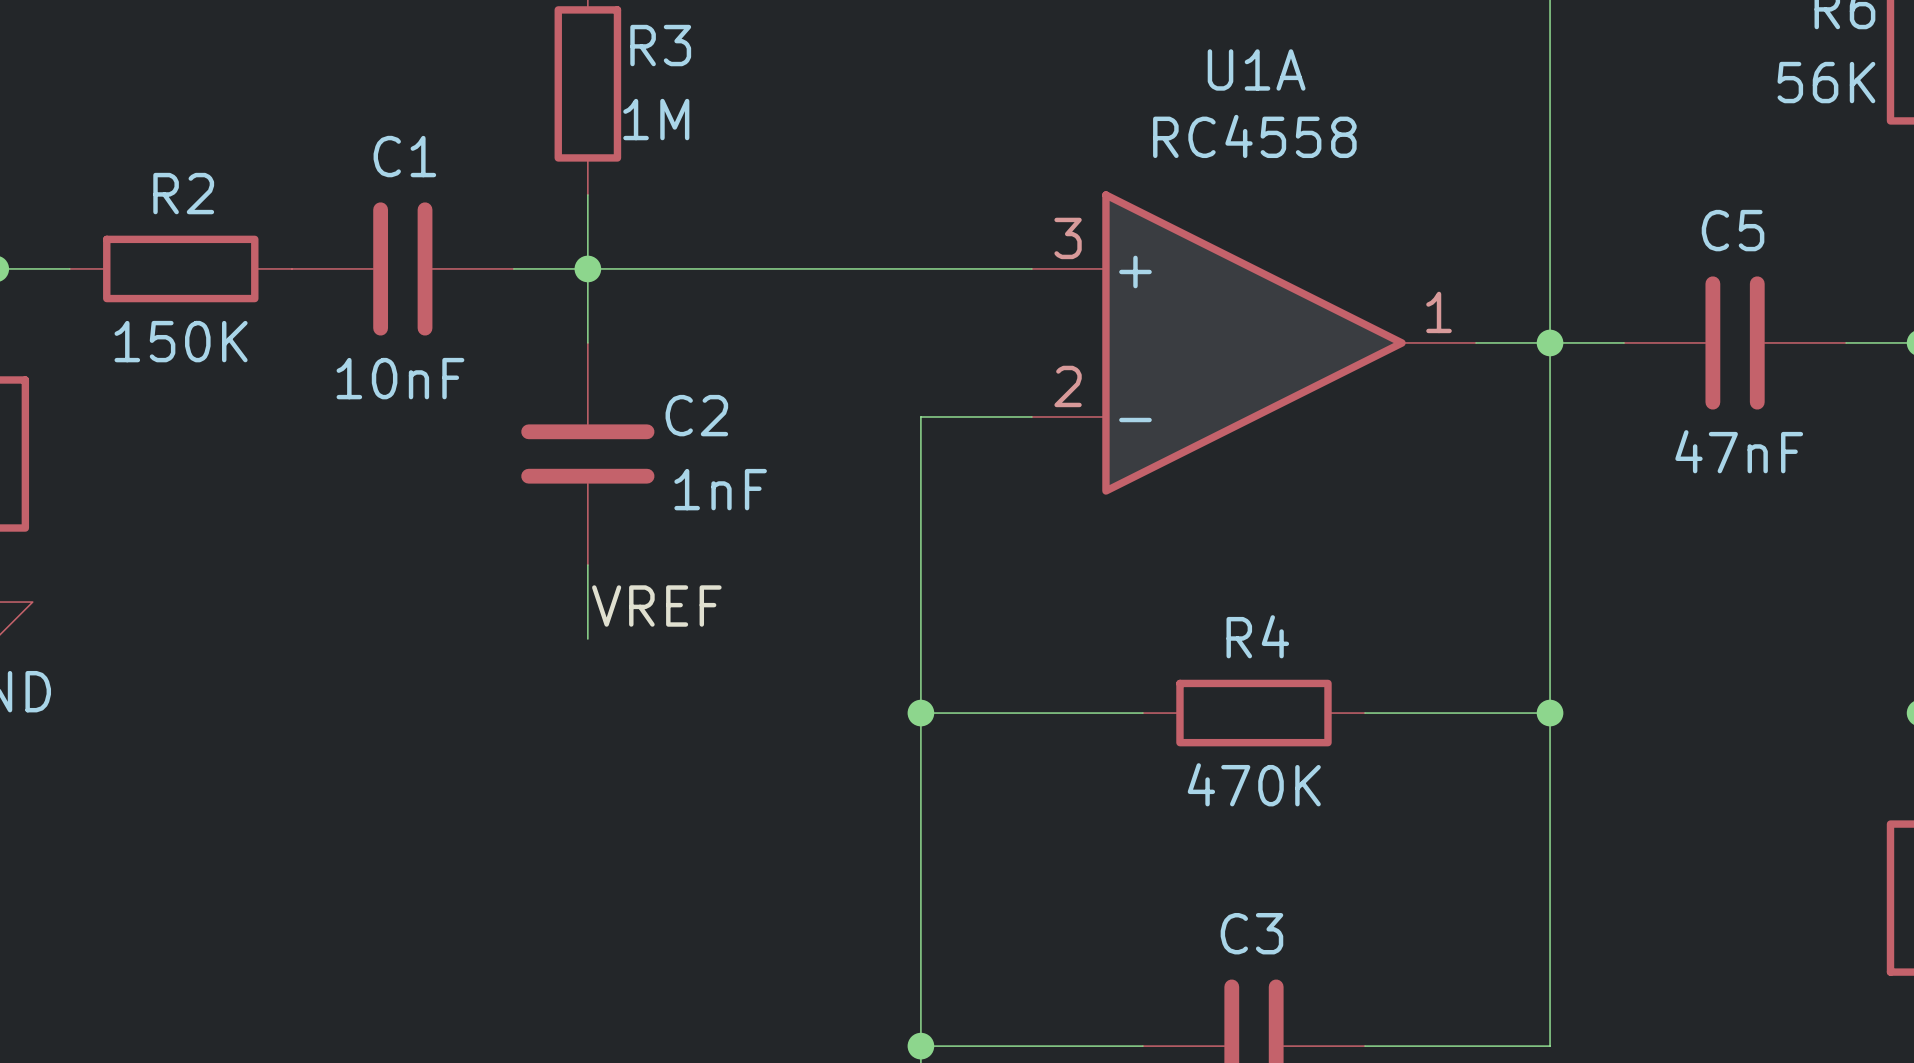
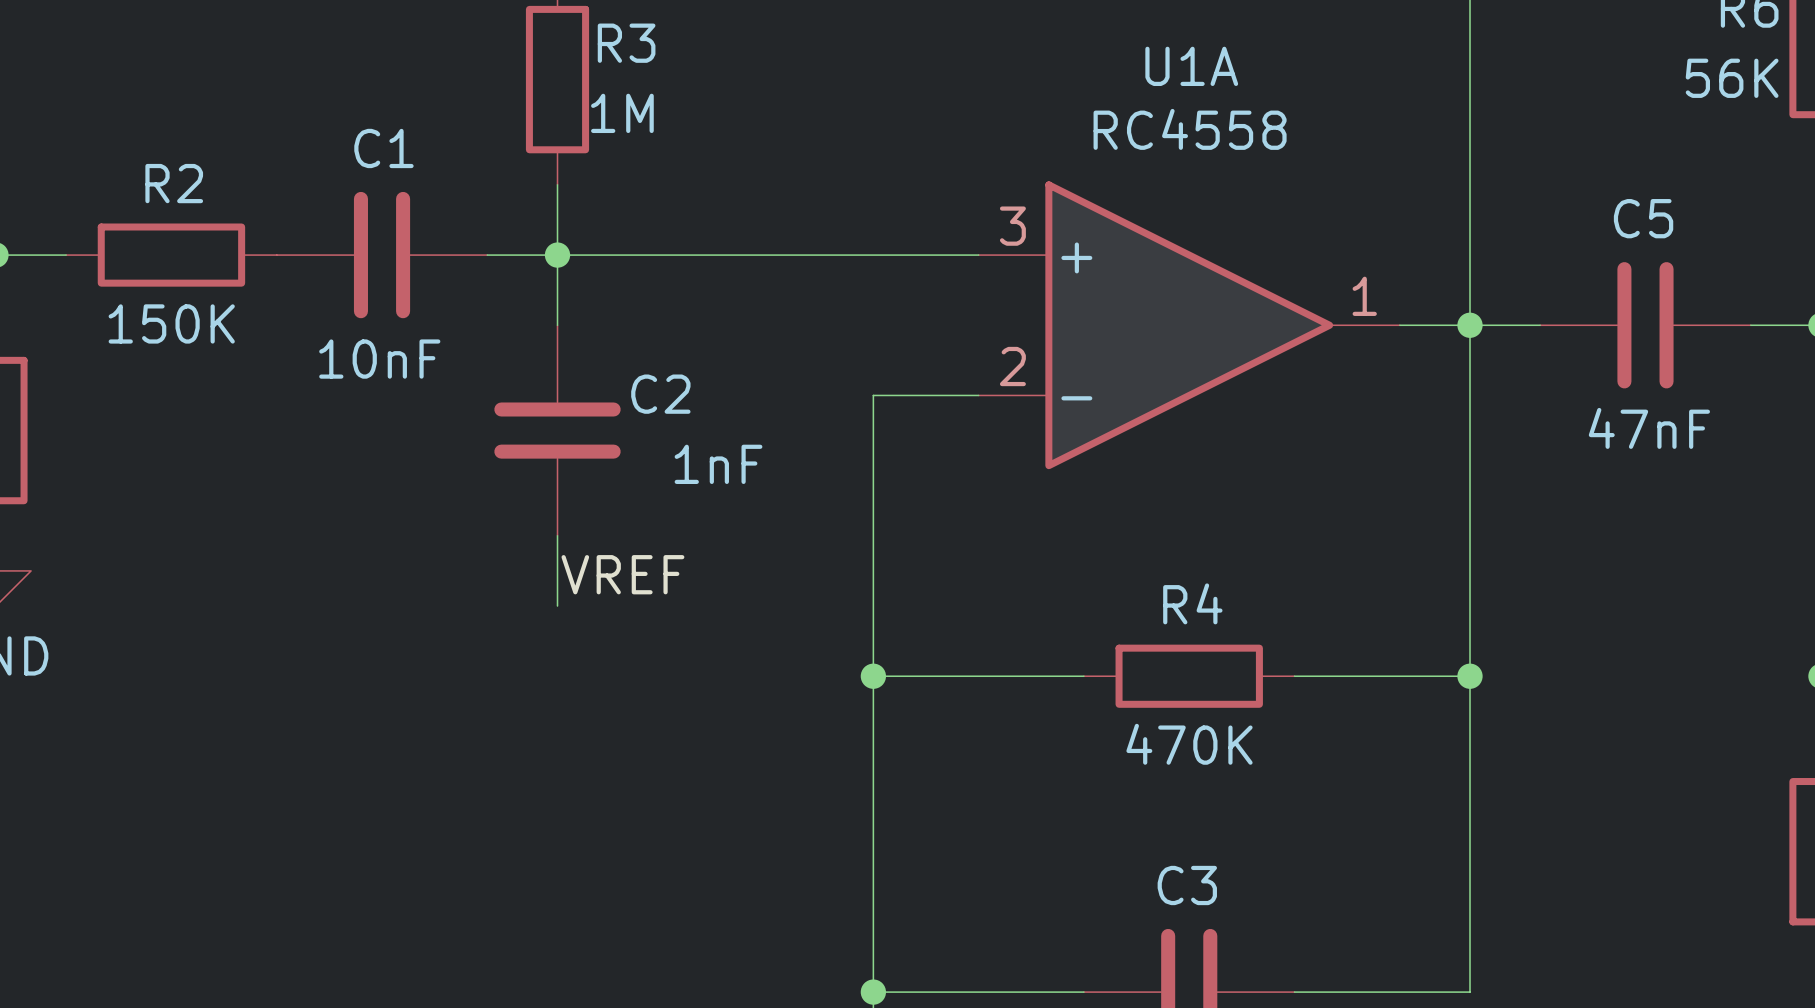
C2 value position: 1nF (720, 489) -> 1nF (718, 464)

